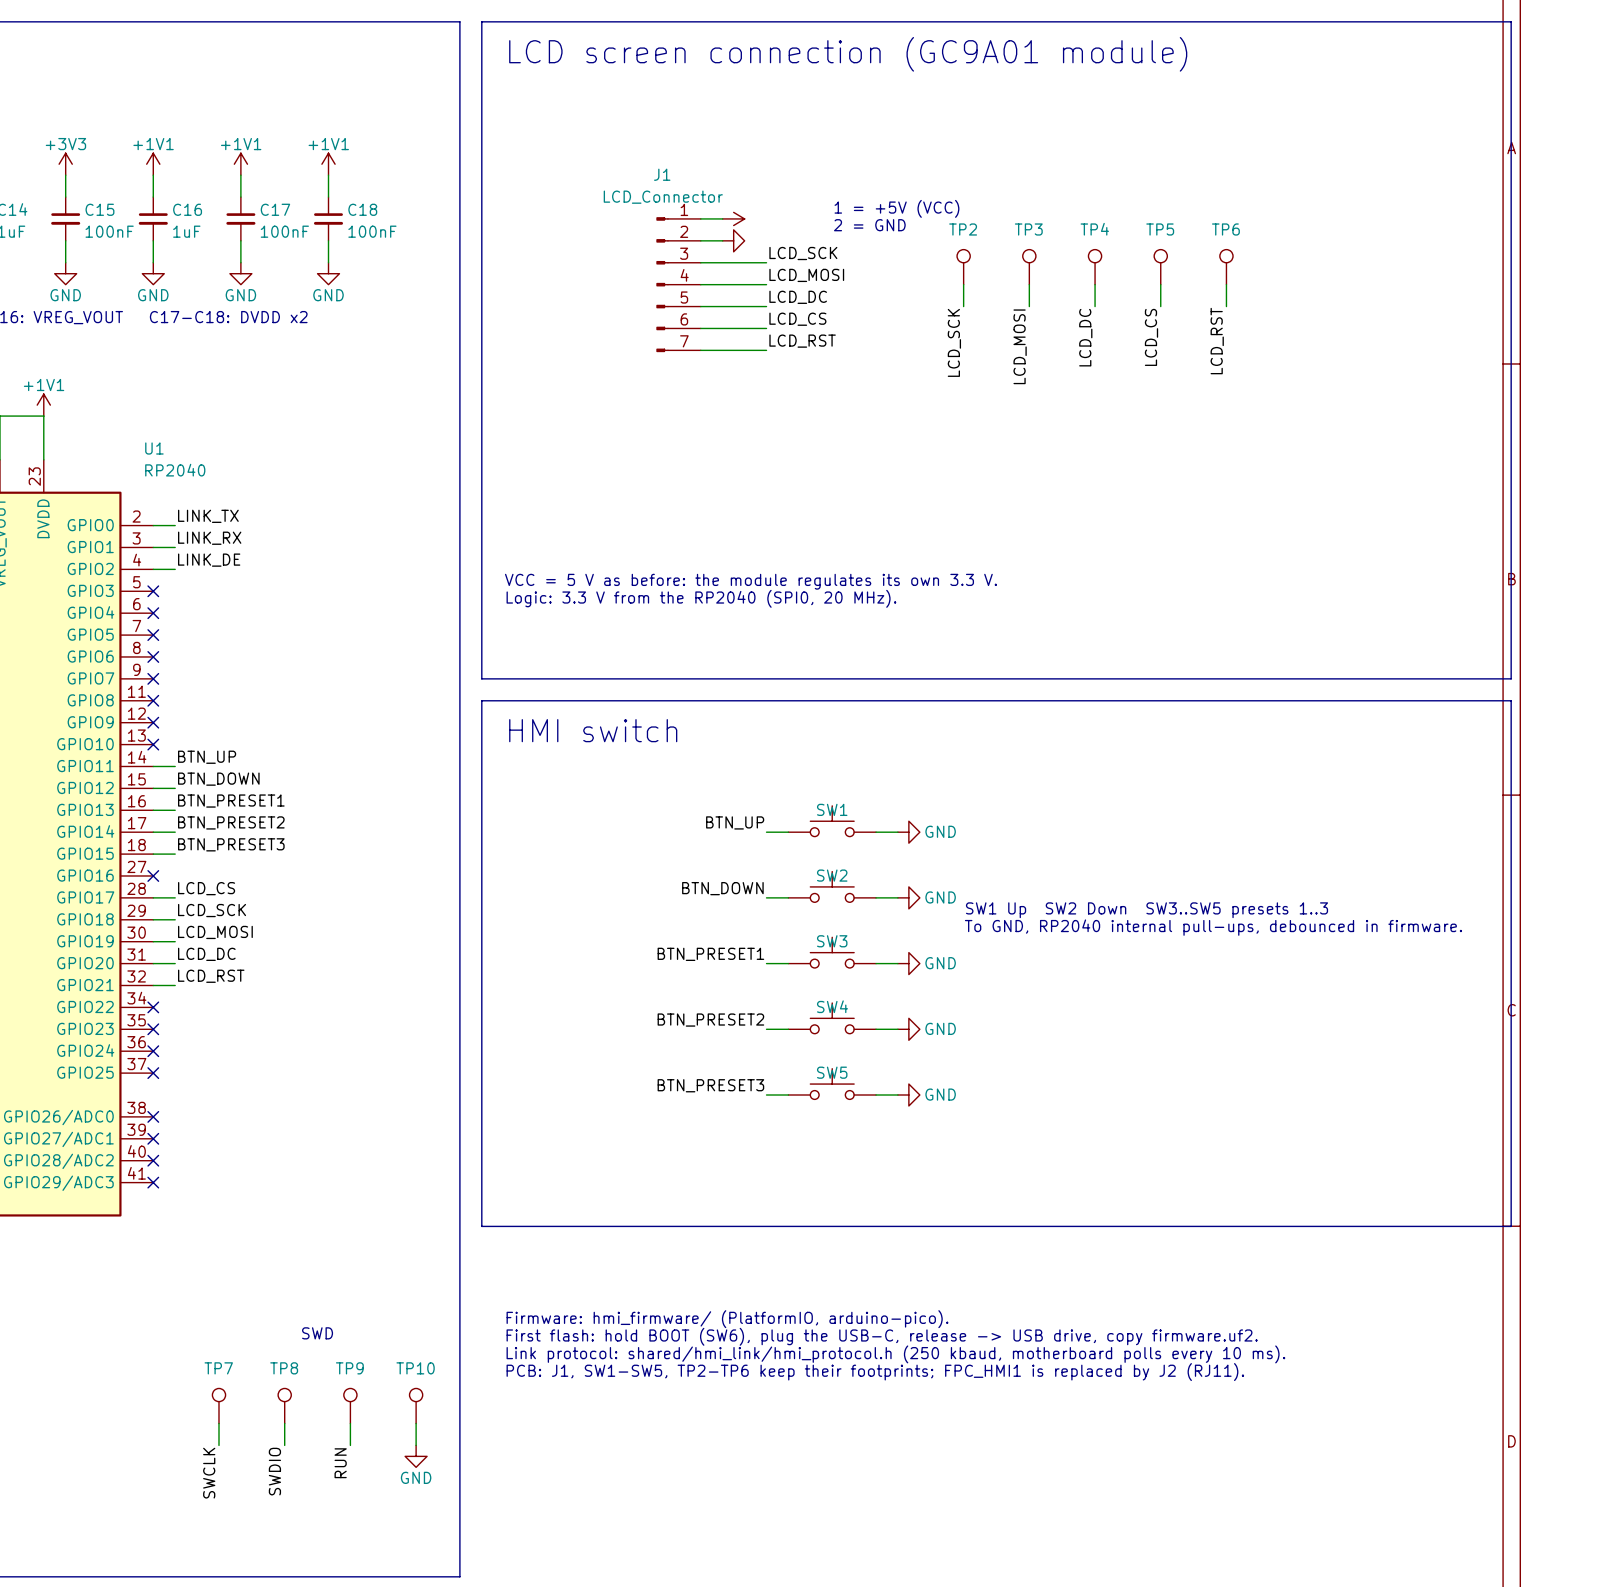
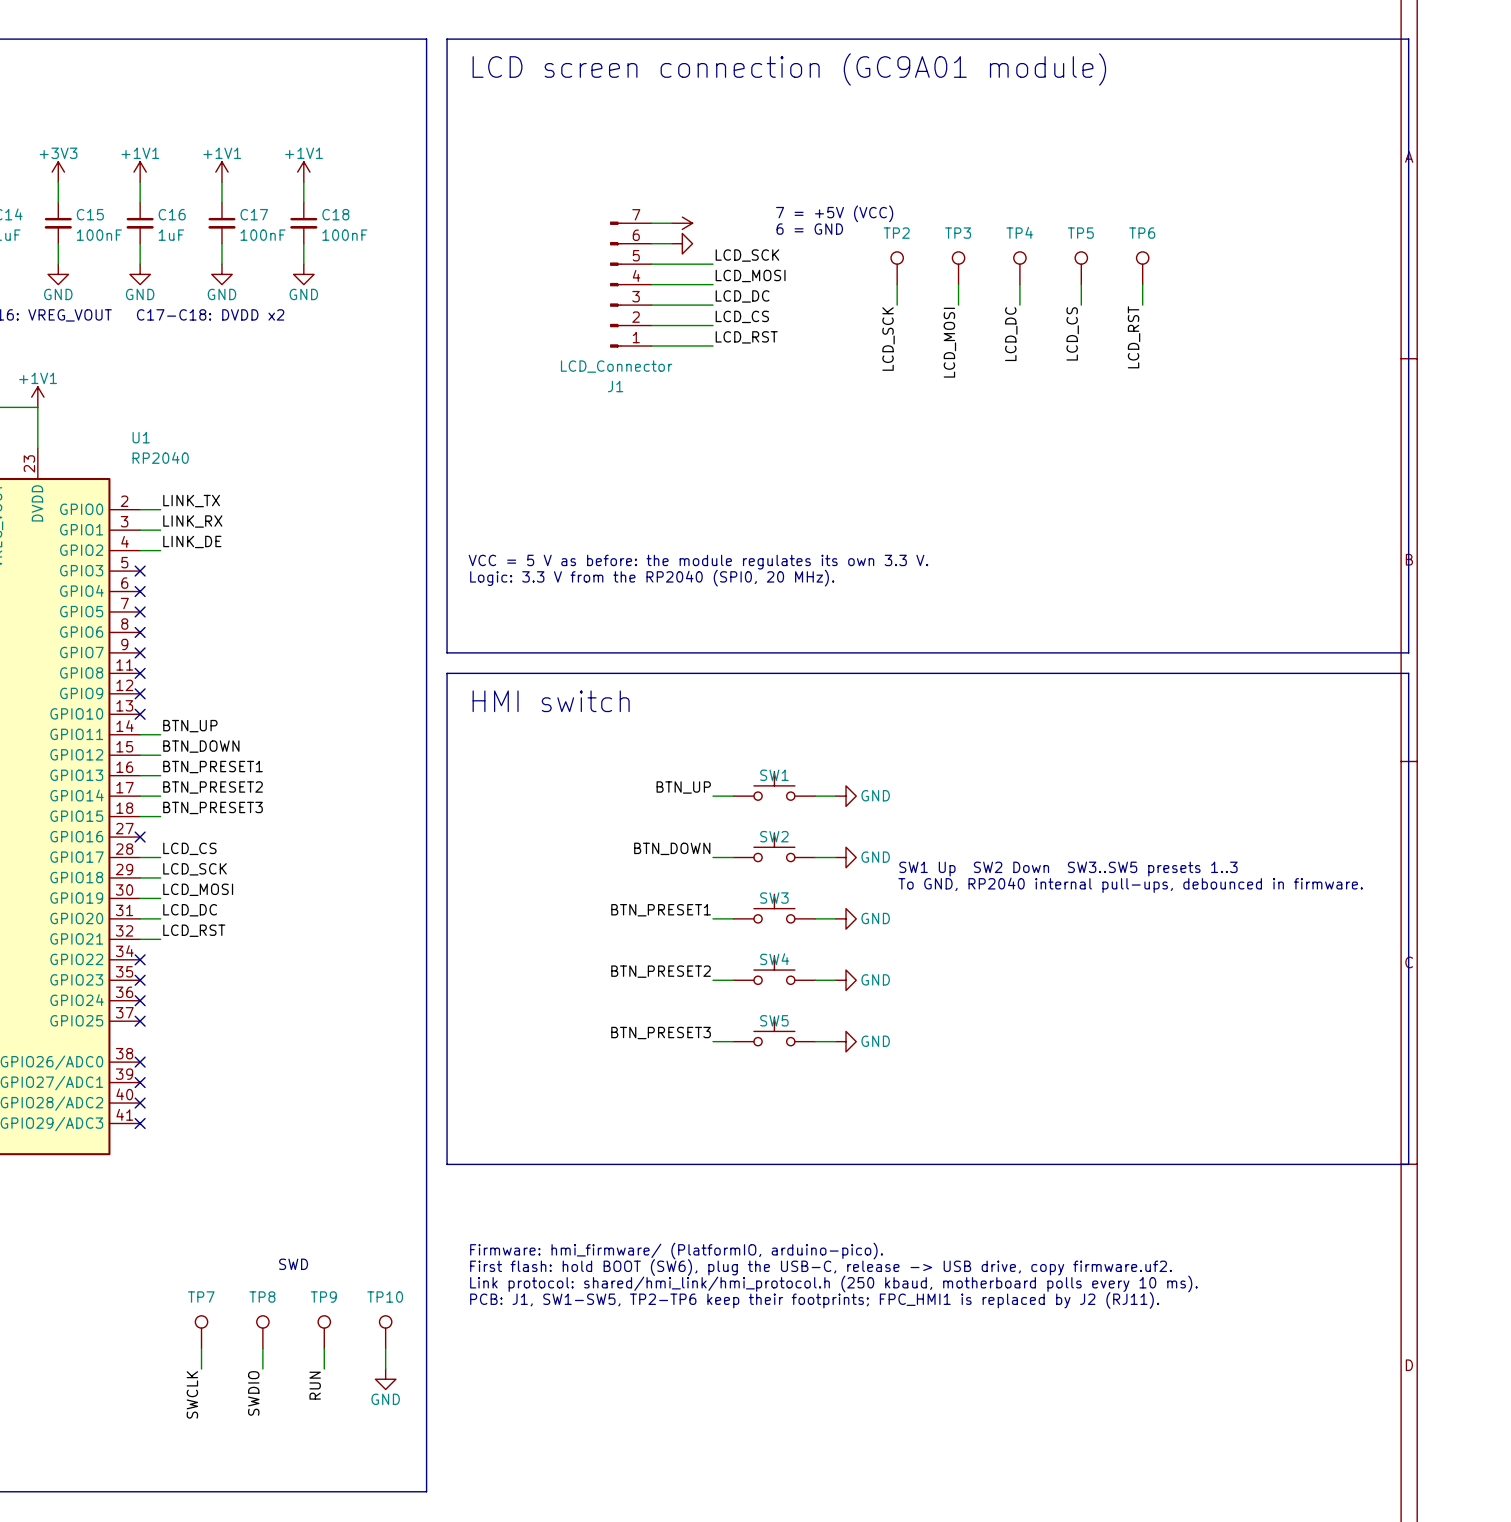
text: 1 = +5V (VCC) (896, 208) -> 7 = +5V (VCC) (834, 213)
text: 2 = GND (869, 225) -> 6 = GND (809, 229)
J1 flip: as is (662, 284) -> up-down (615, 284)

